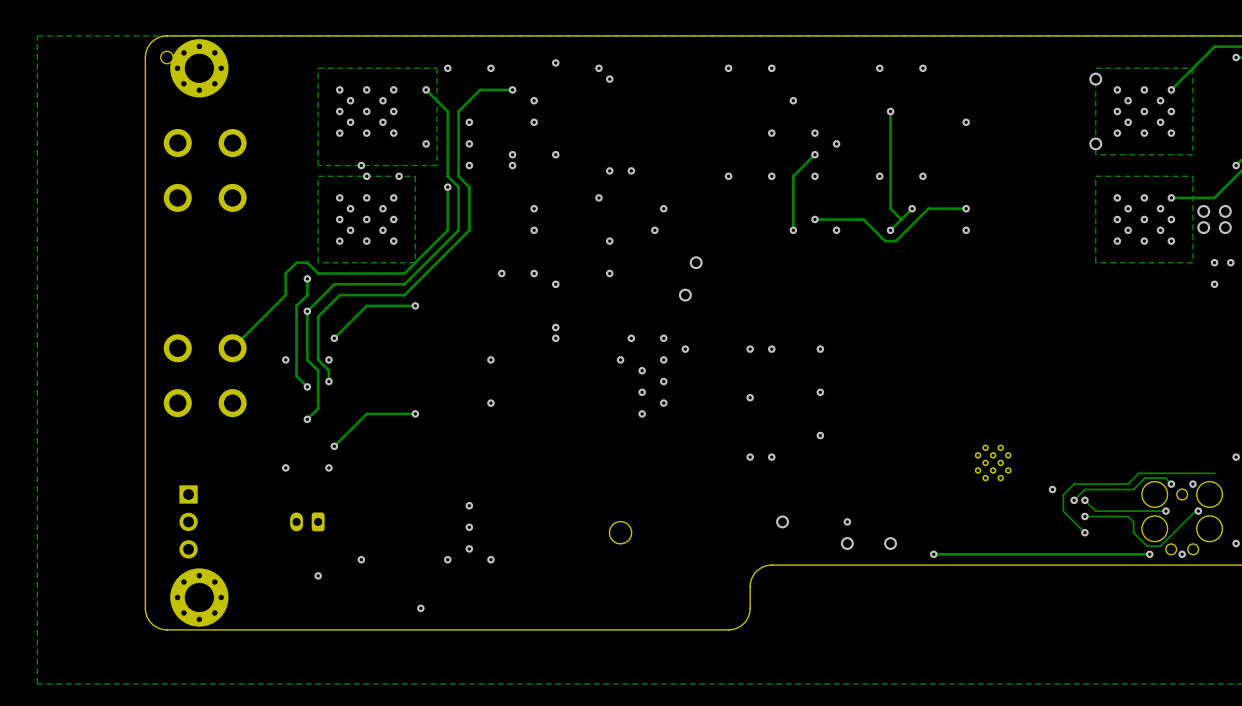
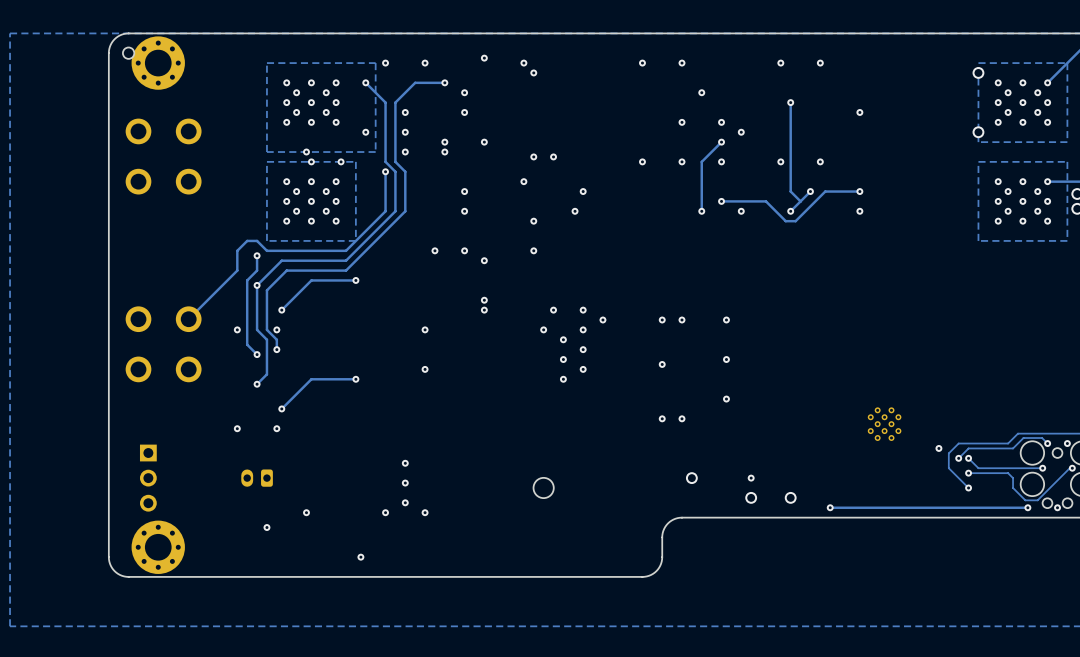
via: (696, 262) -> none
via: (685, 295) -> none

